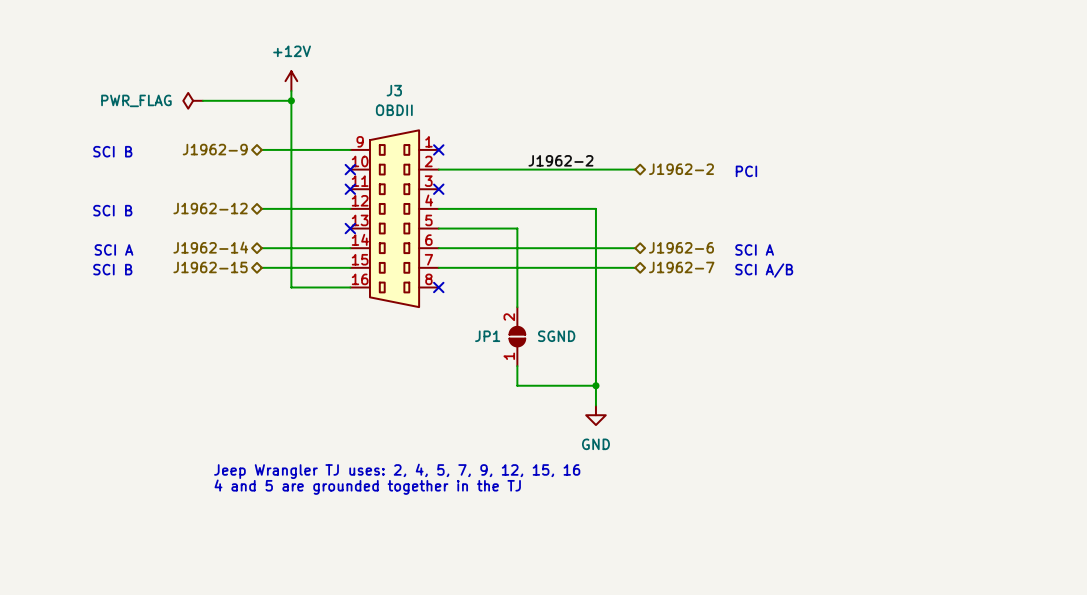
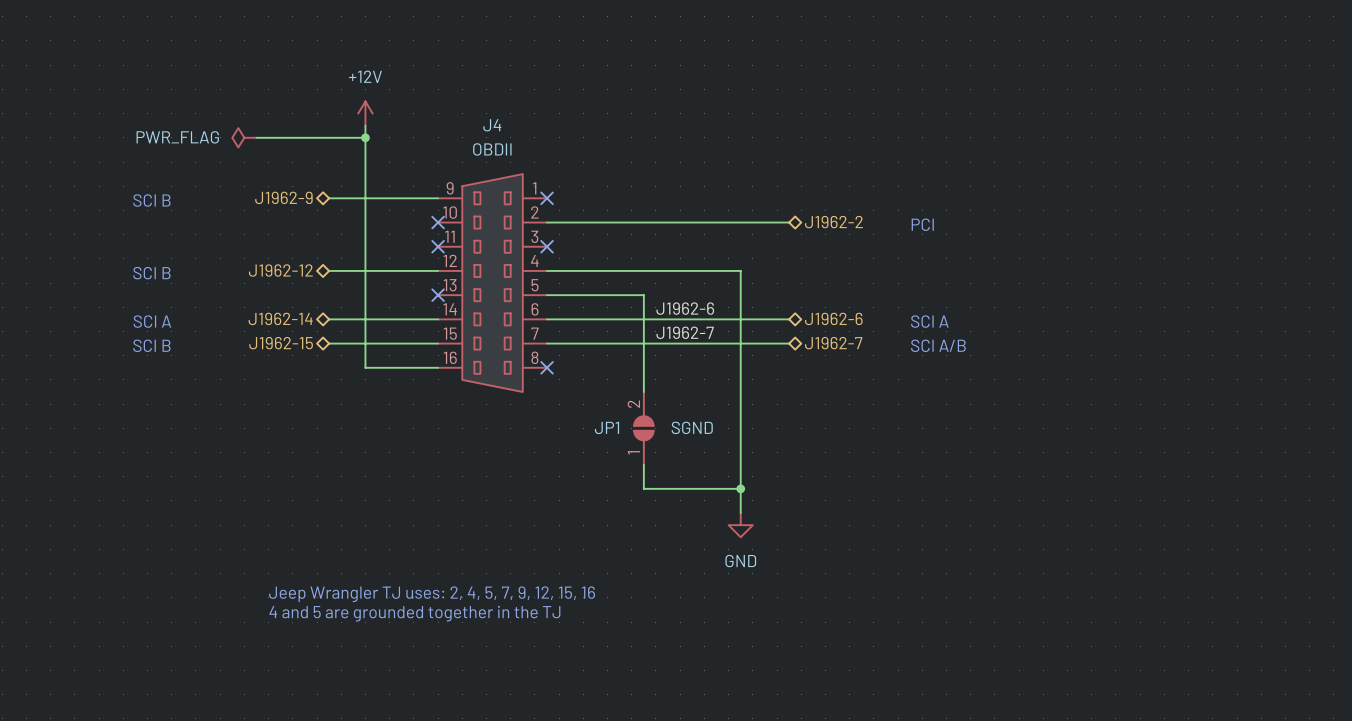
J3 name: J3 (394, 90) -> J4 (492, 125)
label: J1962-2 (560, 160) -> none
label: none -> J1962-6 (685, 308)
label: none -> J1962-7 (685, 332)

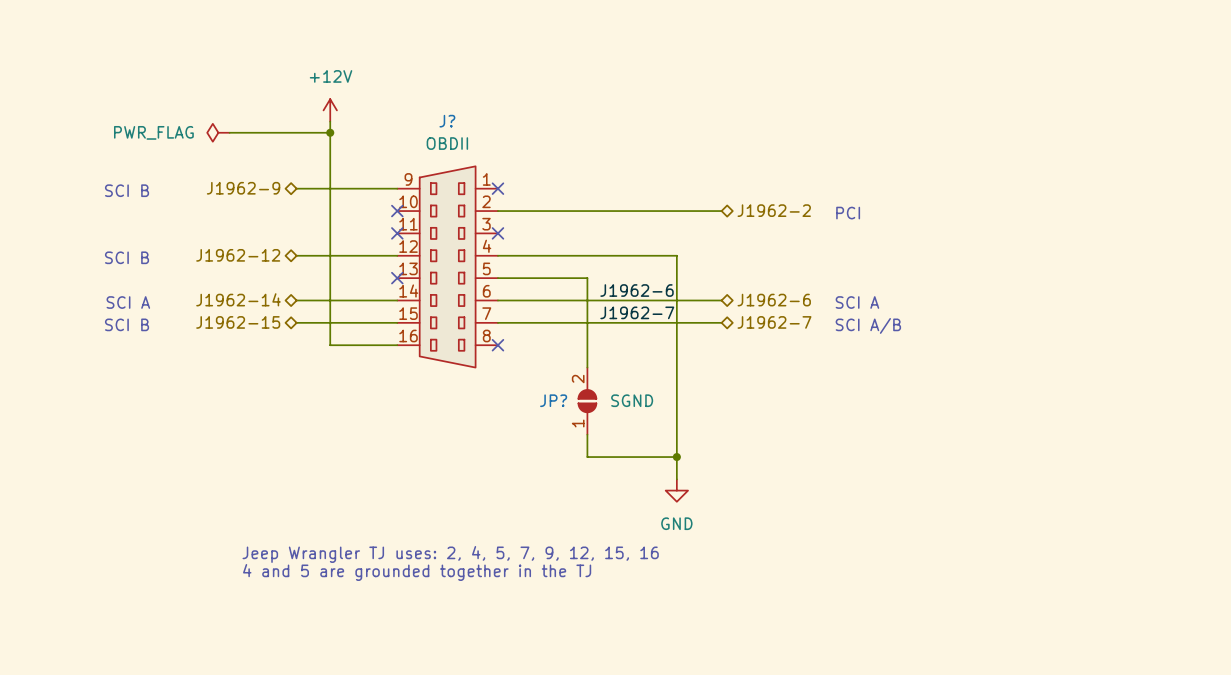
J4 name: J4 (492, 125) -> J? (447, 121)
JP1 name: JP1 (607, 427) -> JP? (553, 400)

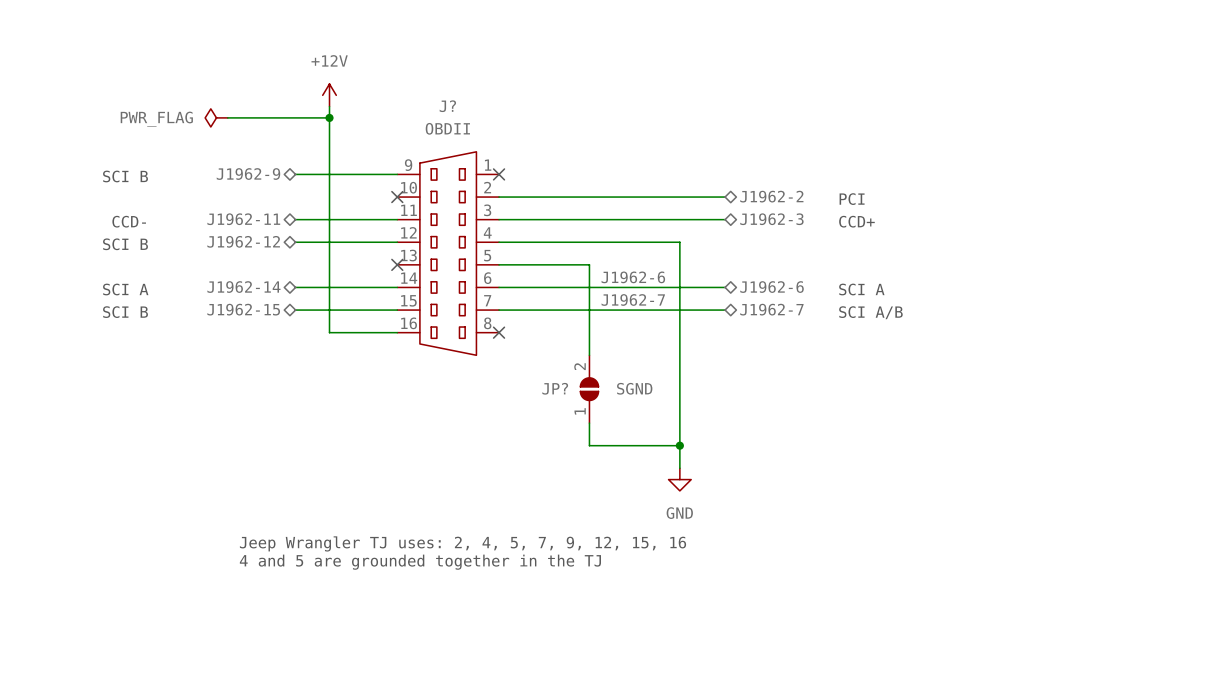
hierarchical label: none -> J1962-11 (243, 219)
hierarchical label: none -> J1962-3 (771, 219)
wire: none -> (295, 219) (397, 219)
no-connect mark: (397, 233) -> none
wire: none -> (499, 219) (725, 219)
no-connect mark: (497, 233) -> none
text: none -> CCD- (129, 221)
text: none -> CCD+ (856, 221)

